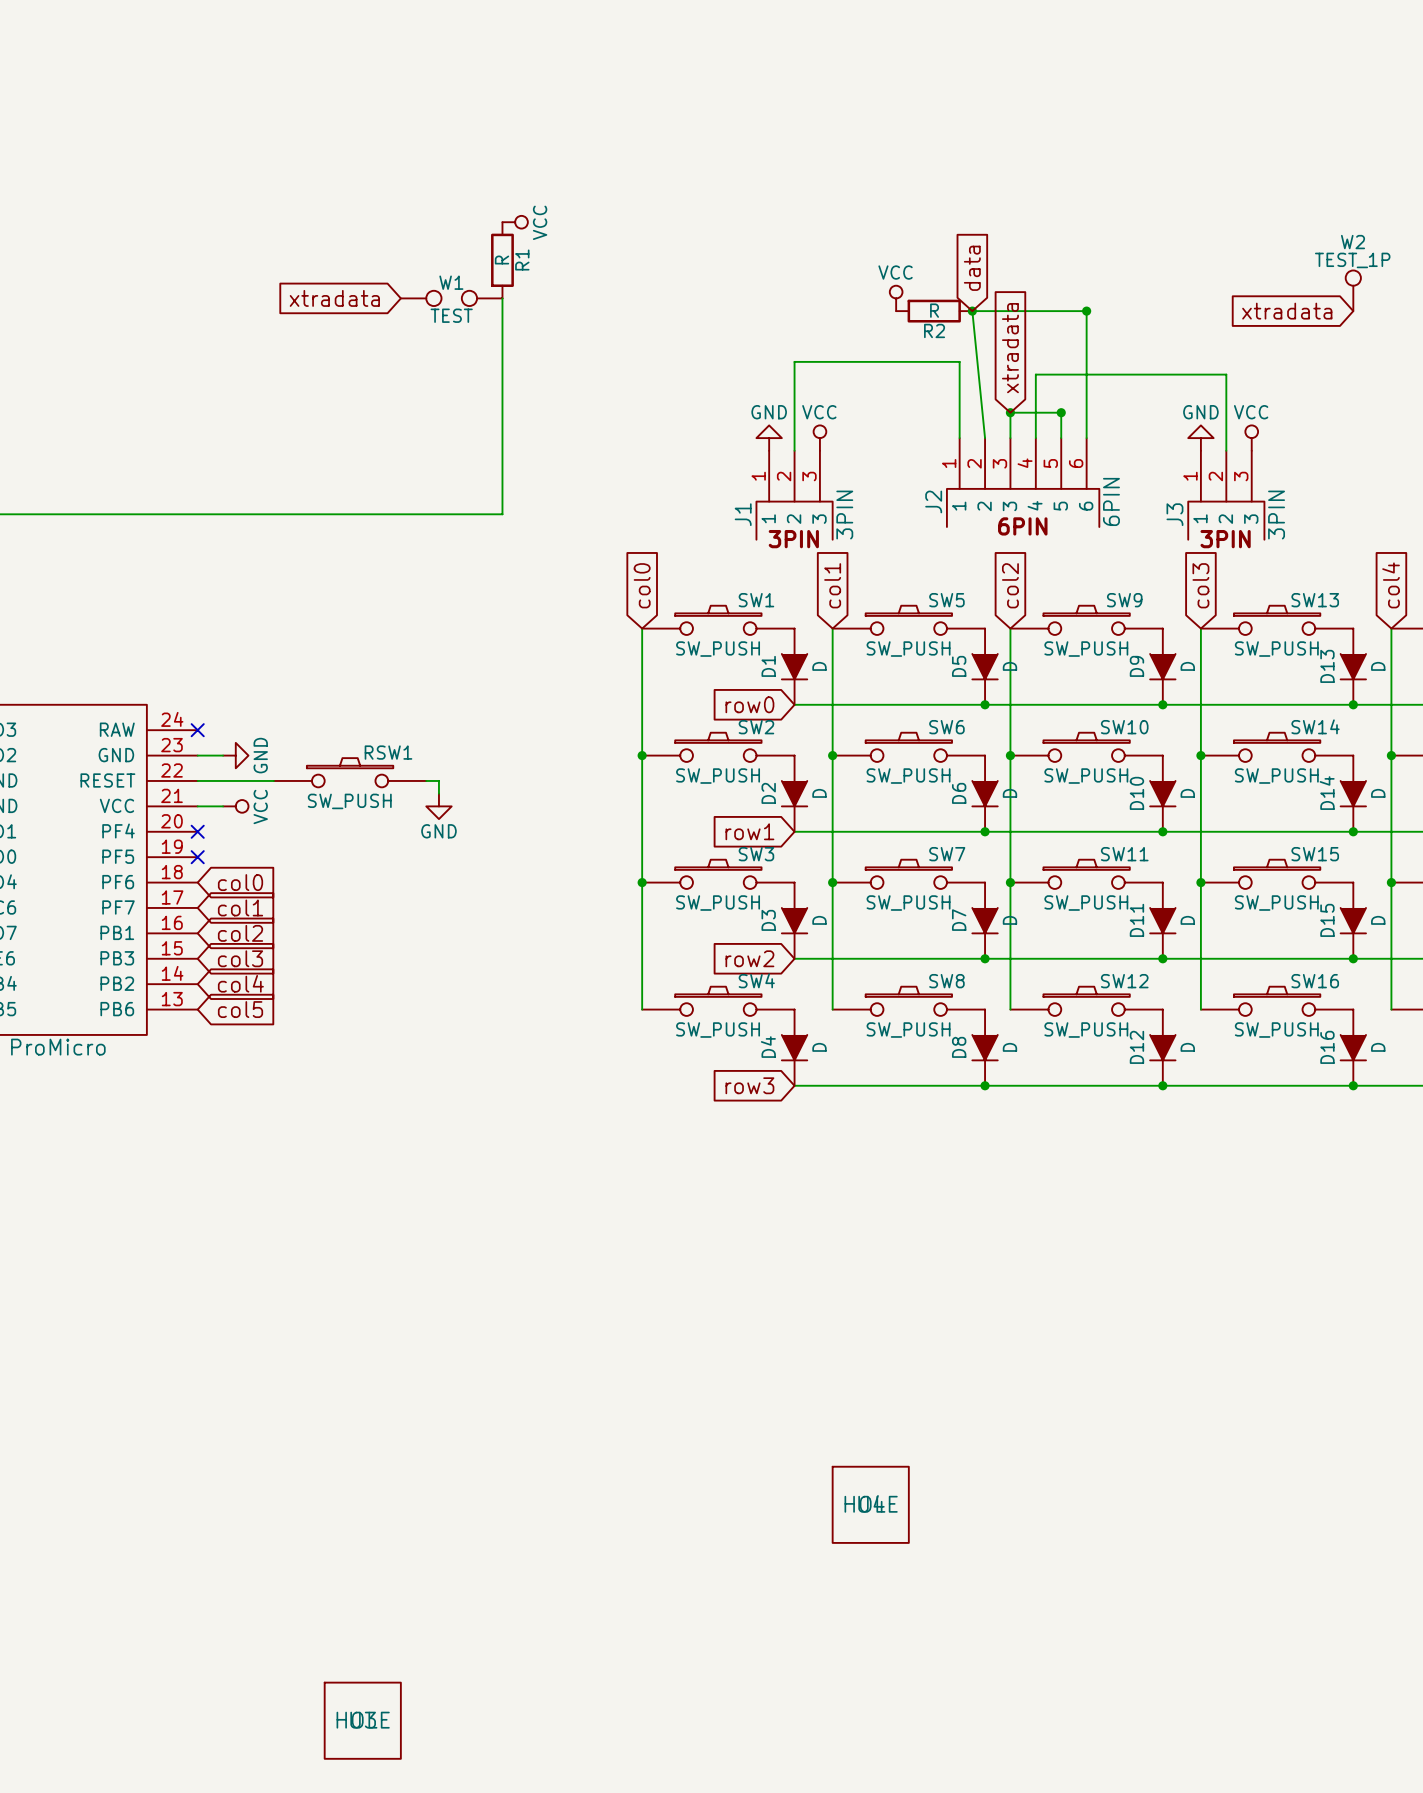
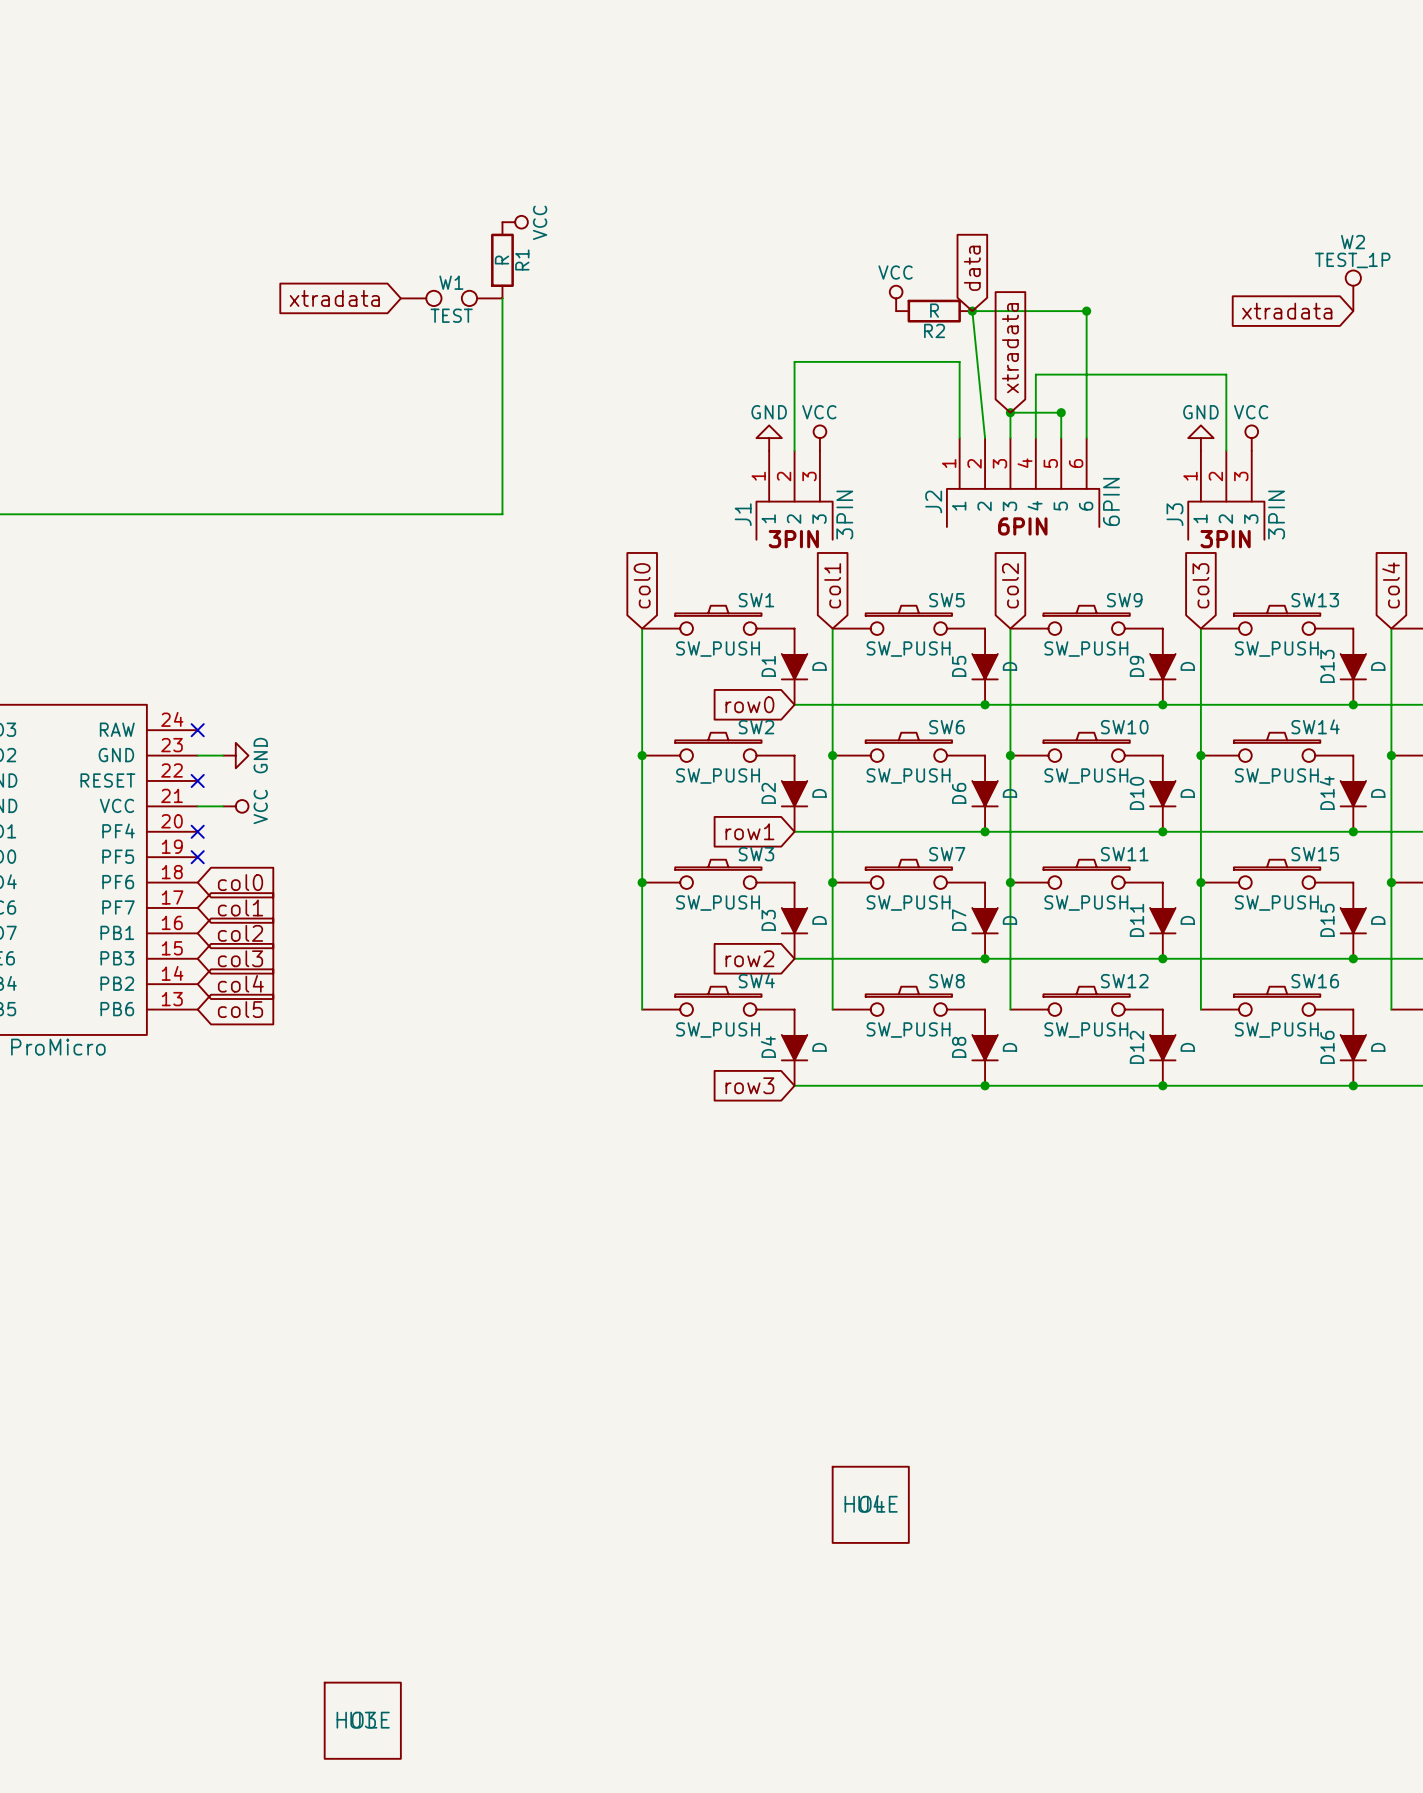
RSW1: SW_PUSH (350, 772) -> none
wire: (197, 780) (273, 780) -> none
no-connect mark: none -> (197, 780)
wire: (426, 780) (438, 780) (438, 793) -> none
power symbol: GND (438, 806) -> none

